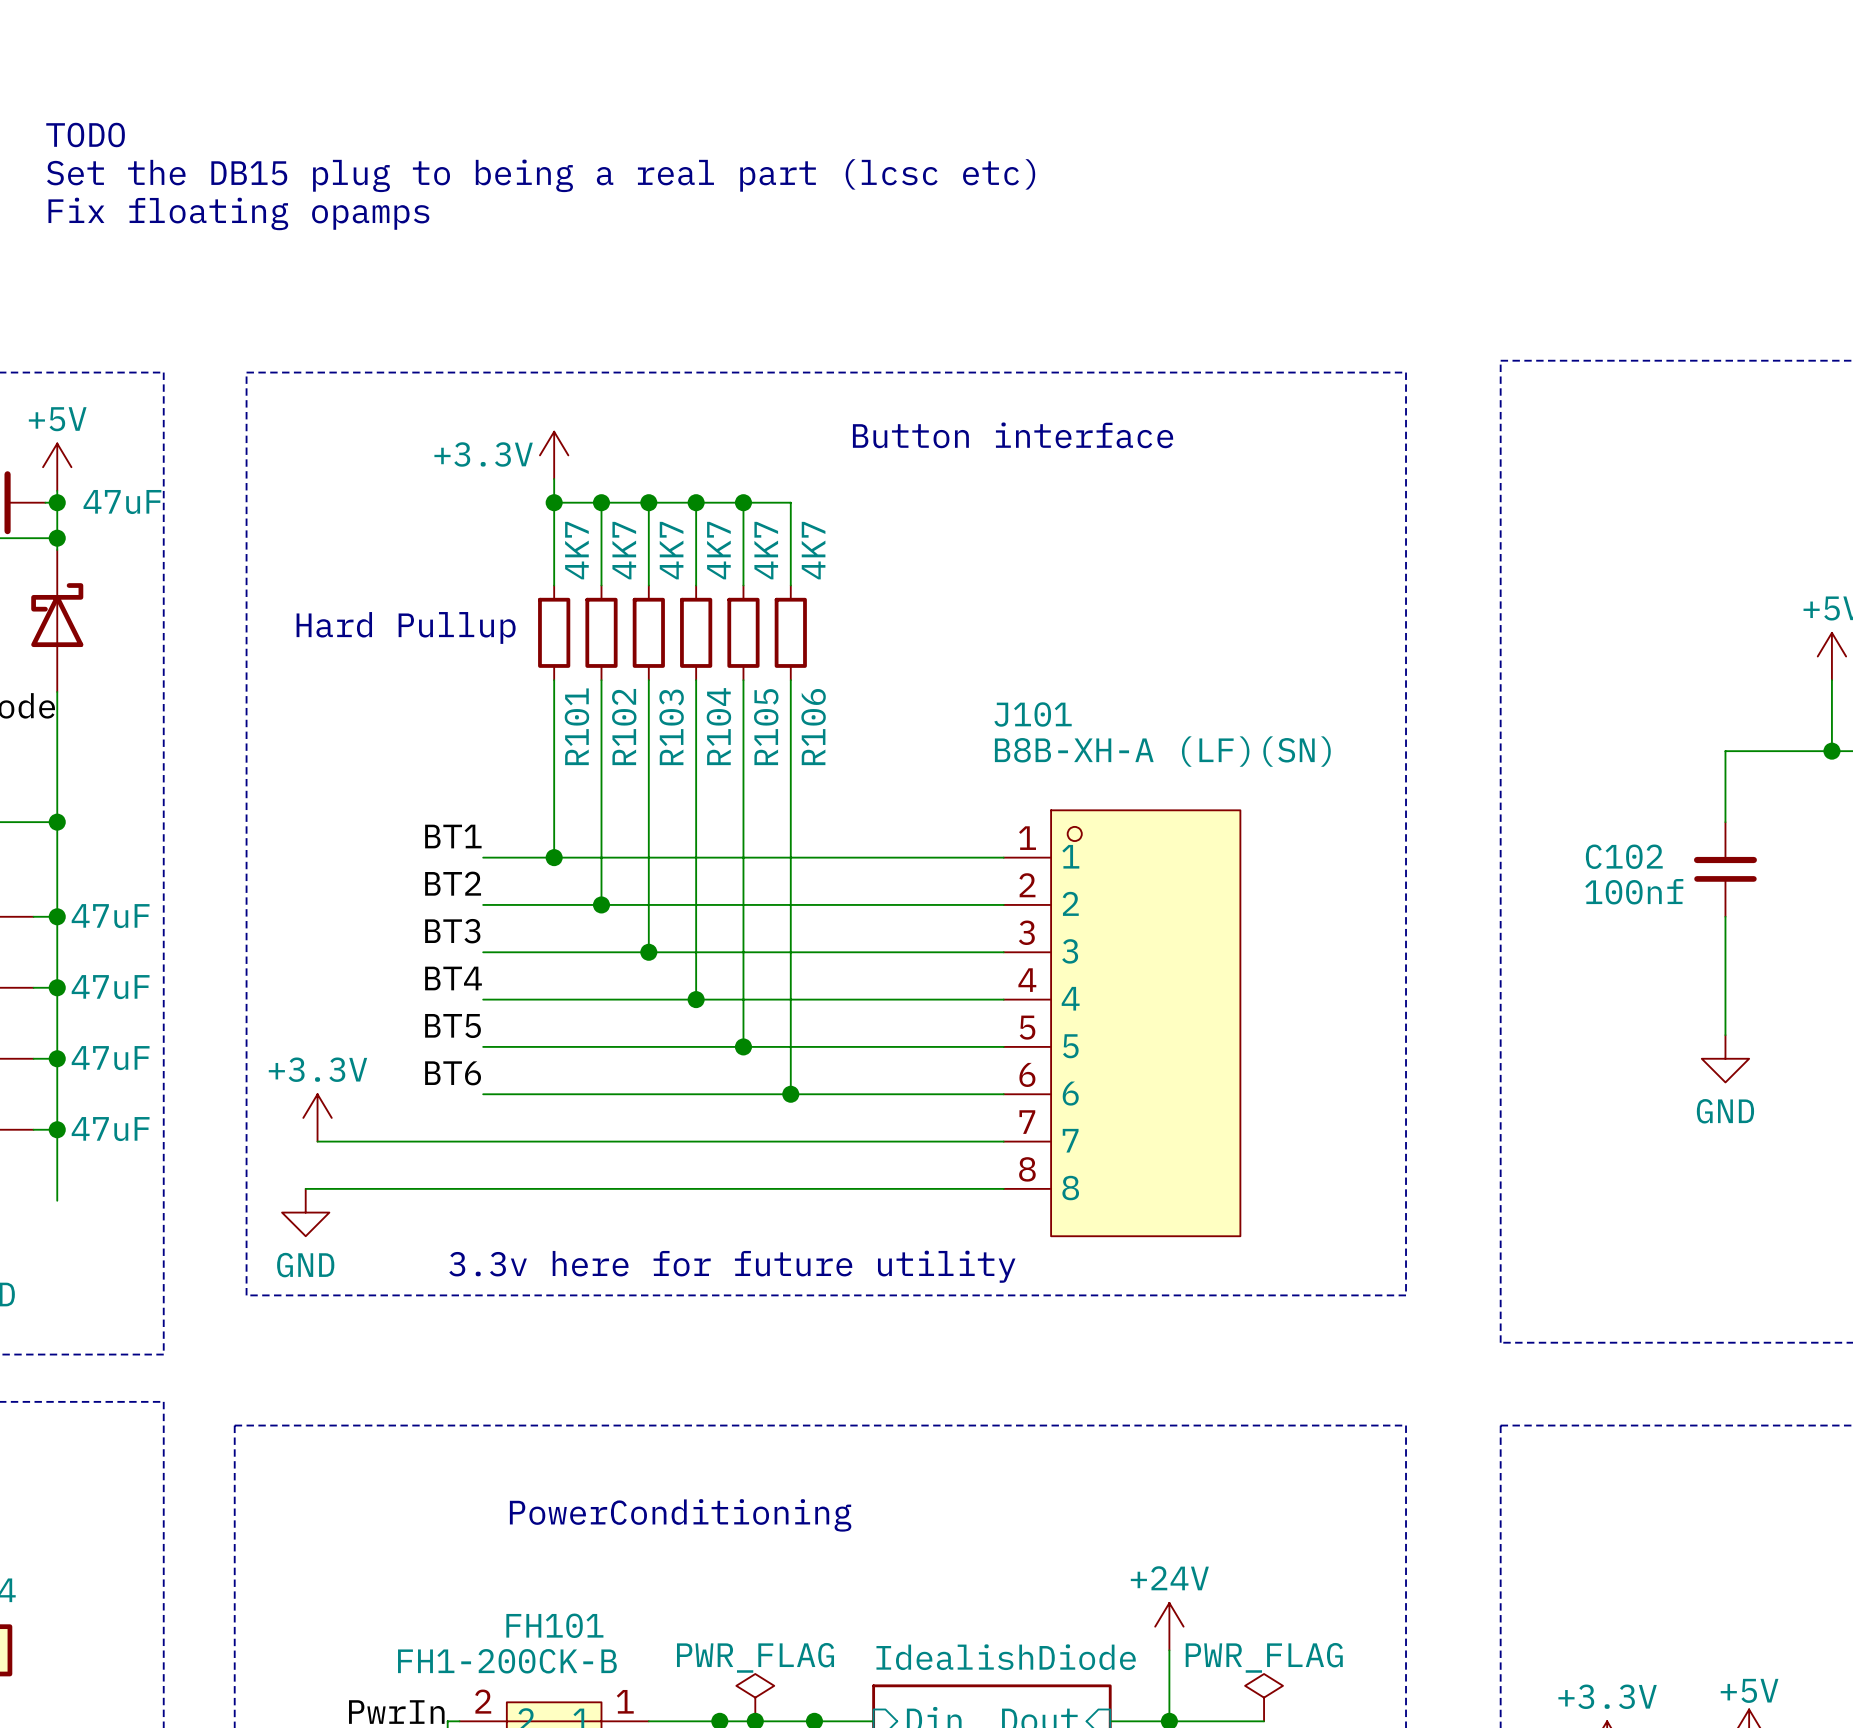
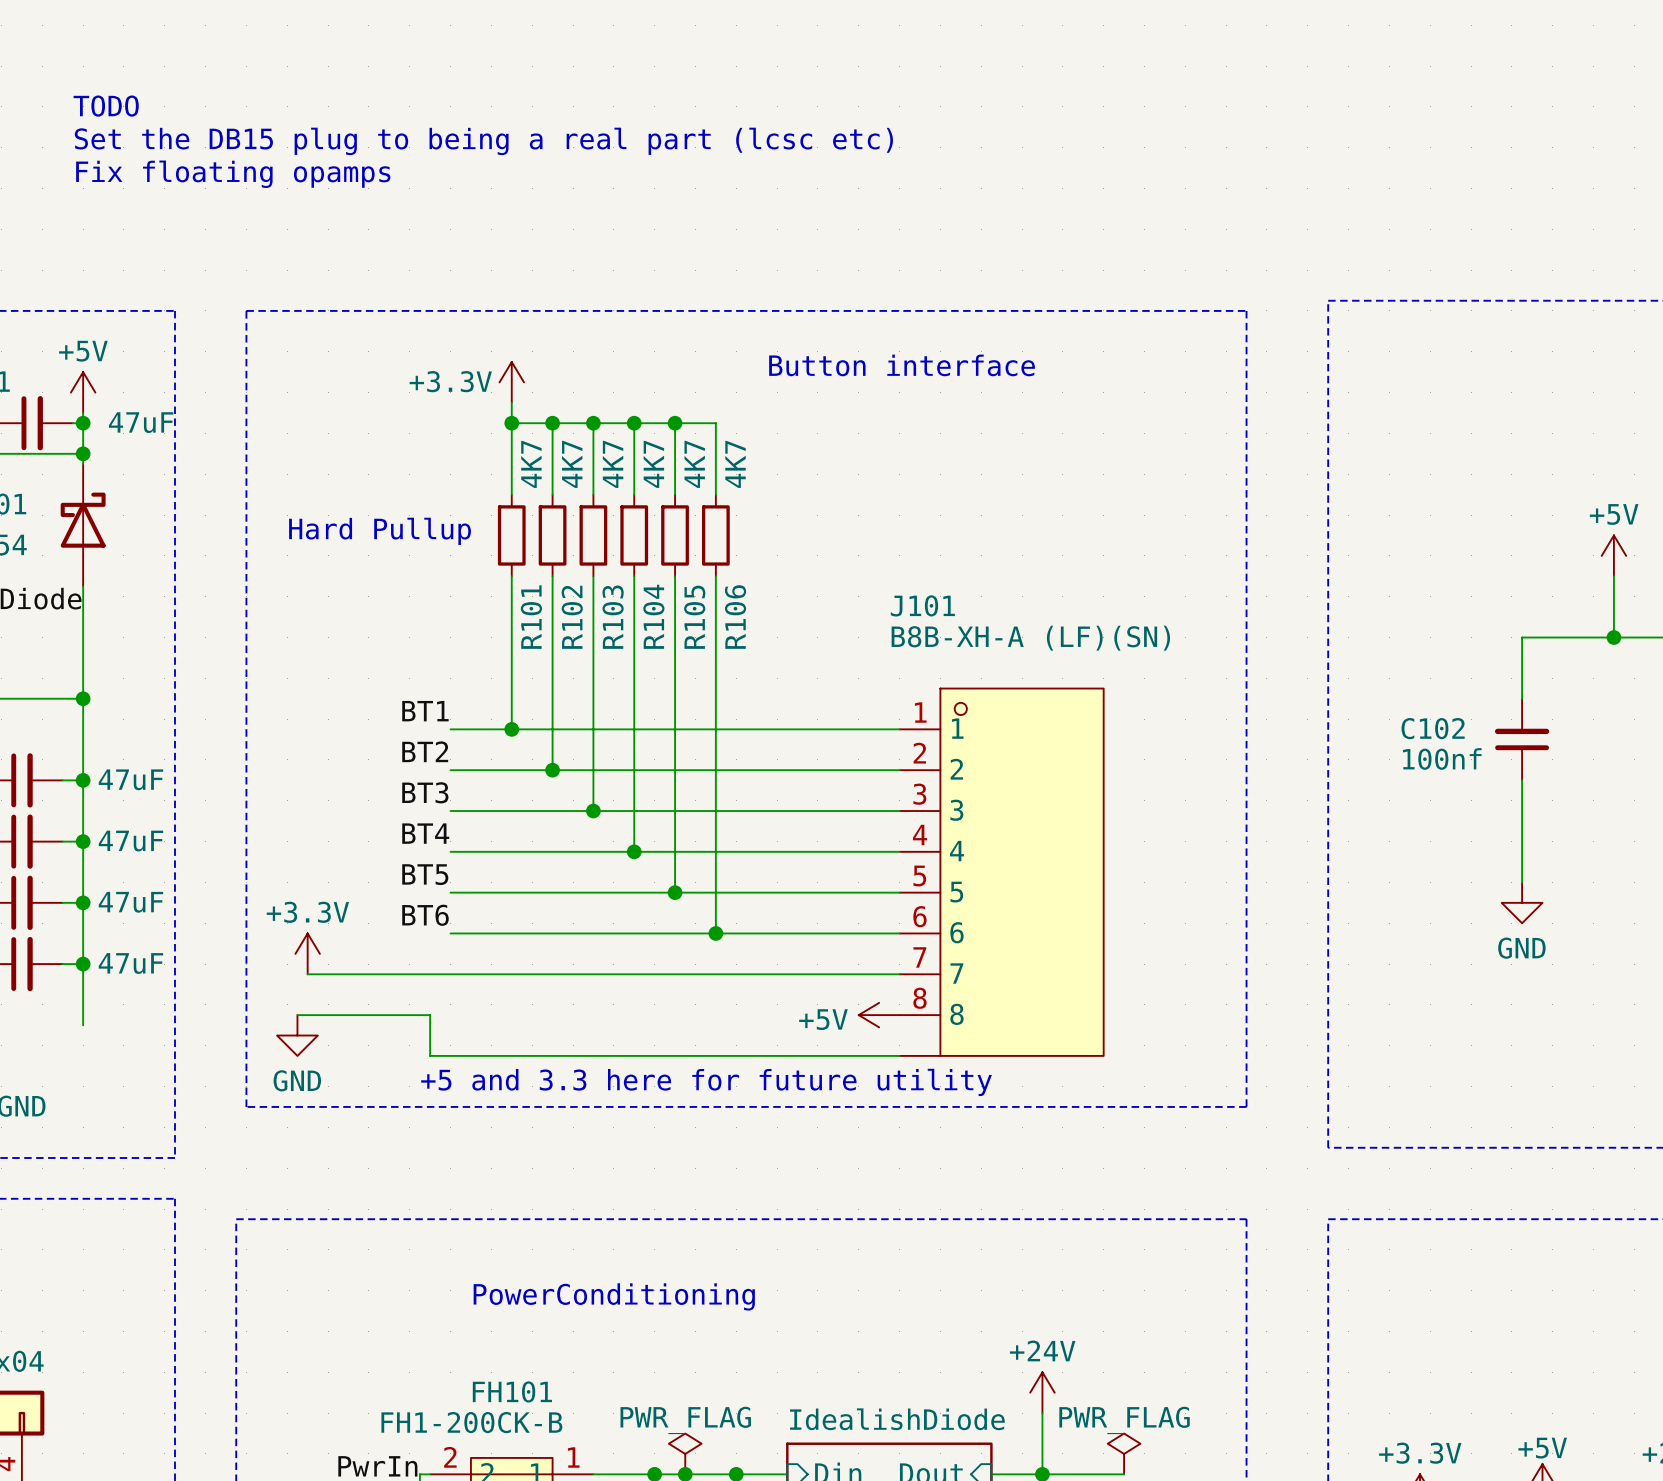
J101 symbol: [1003, 810, 1241, 1237] -> [899, 688, 1104, 1056]
wire: (459, 1188) (1003, 1188) -> (430, 1015) (430, 1055) (899, 1055)
power symbol: none -> +5V (879, 1015)
text: 3.3v here for future utility (732, 1266) -> +5 and 3.3 here for future utility (706, 1082)

